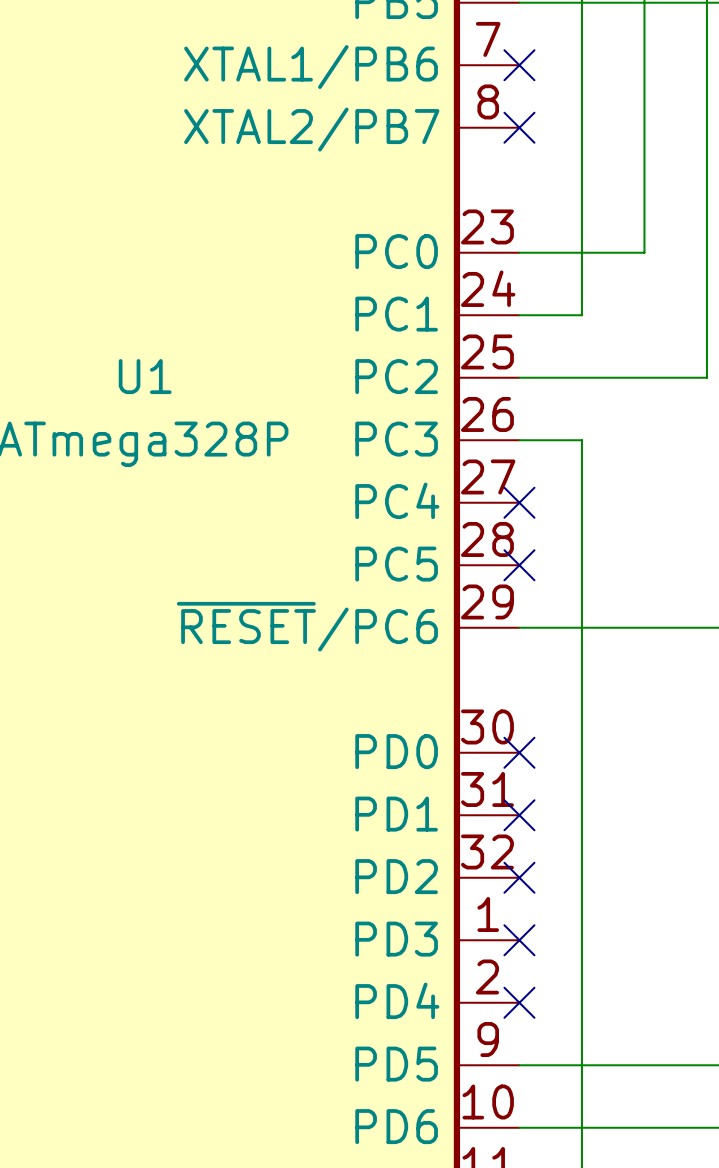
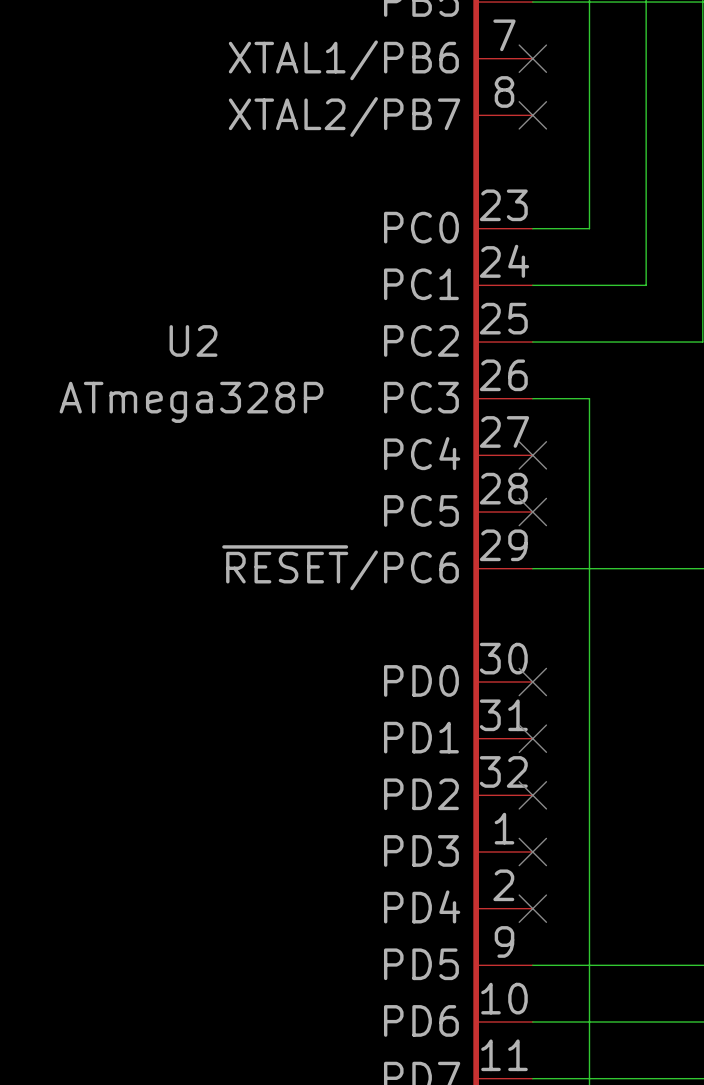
wire: (644, 252) (581, 252) (581, 315) -> (646, 228) (646, 285) (589, 285)
U1 name: U1 (145, 376) -> U2 (193, 340)

